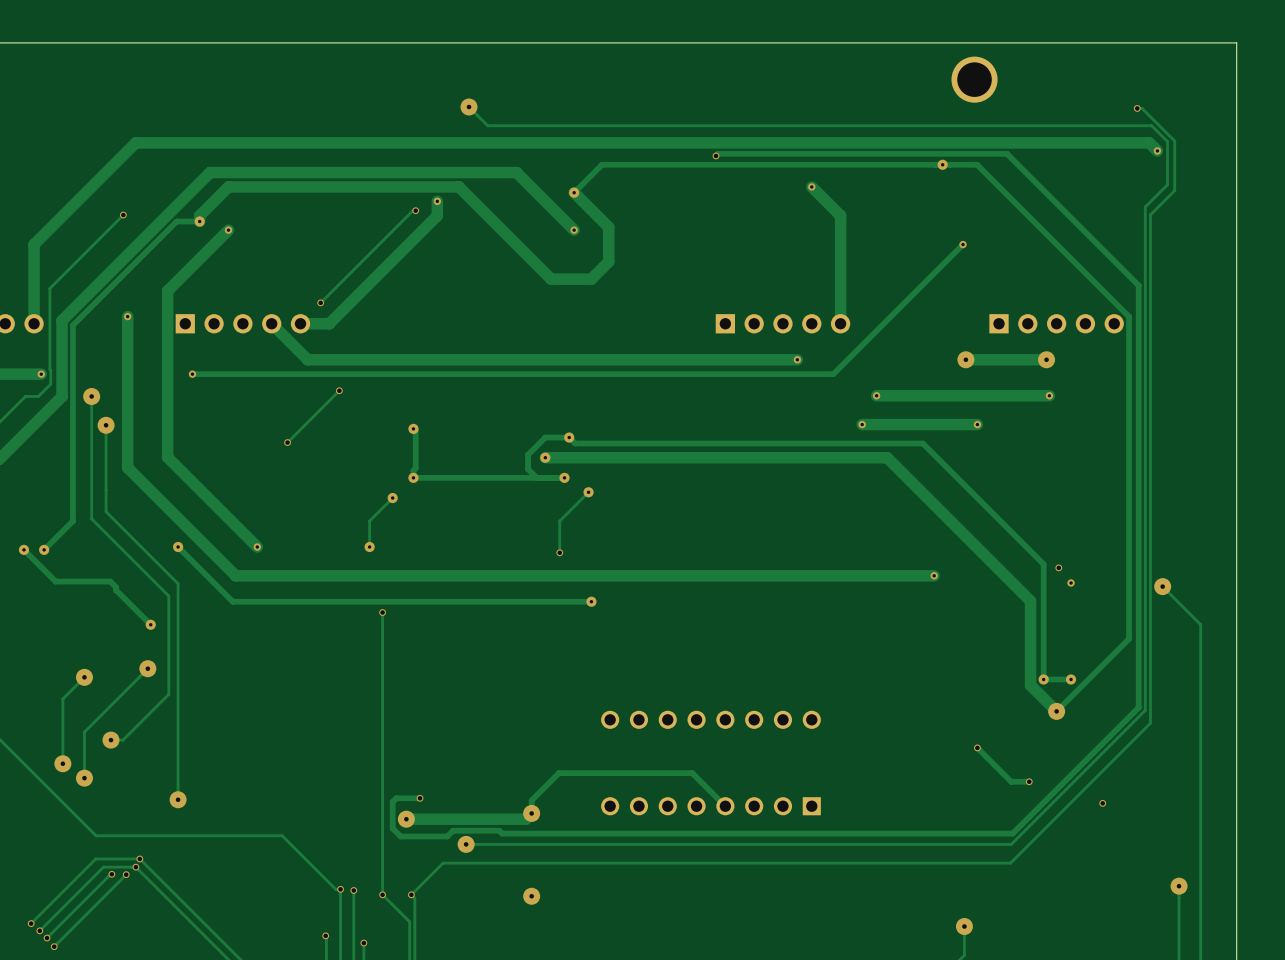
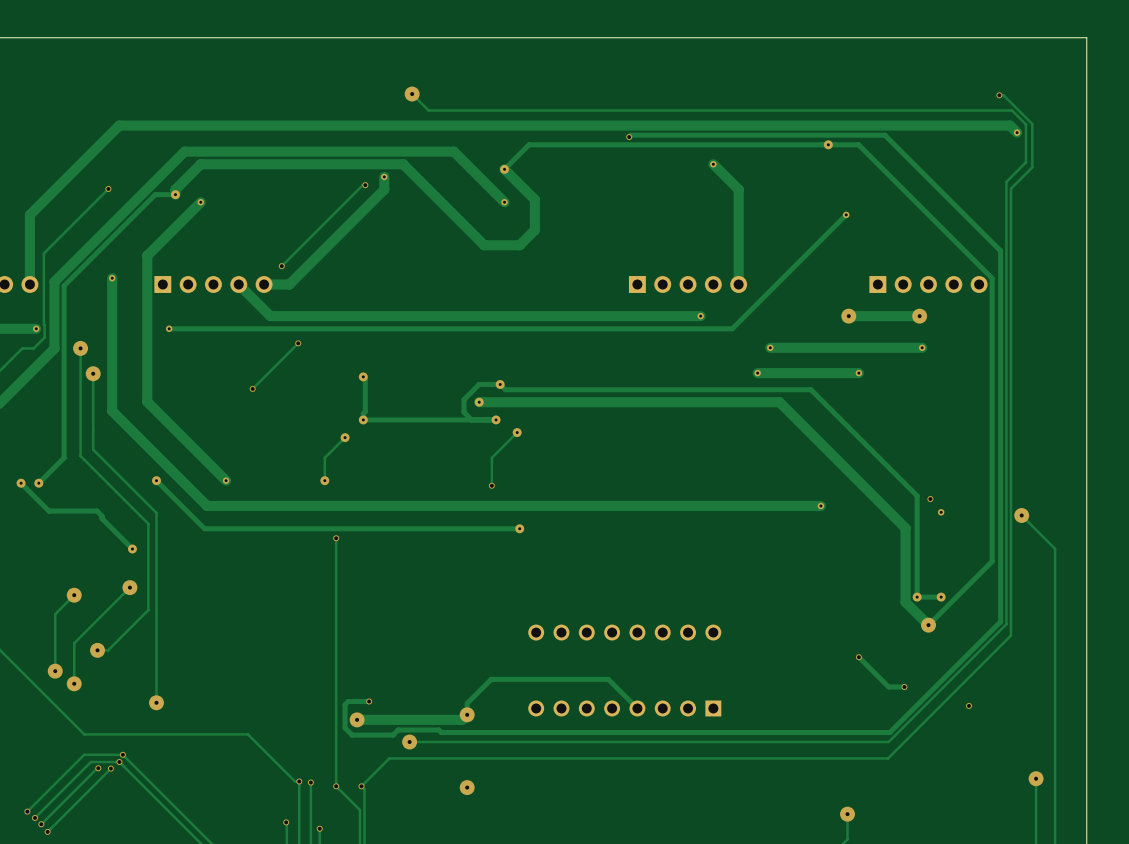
part: (974, 79) -> none

